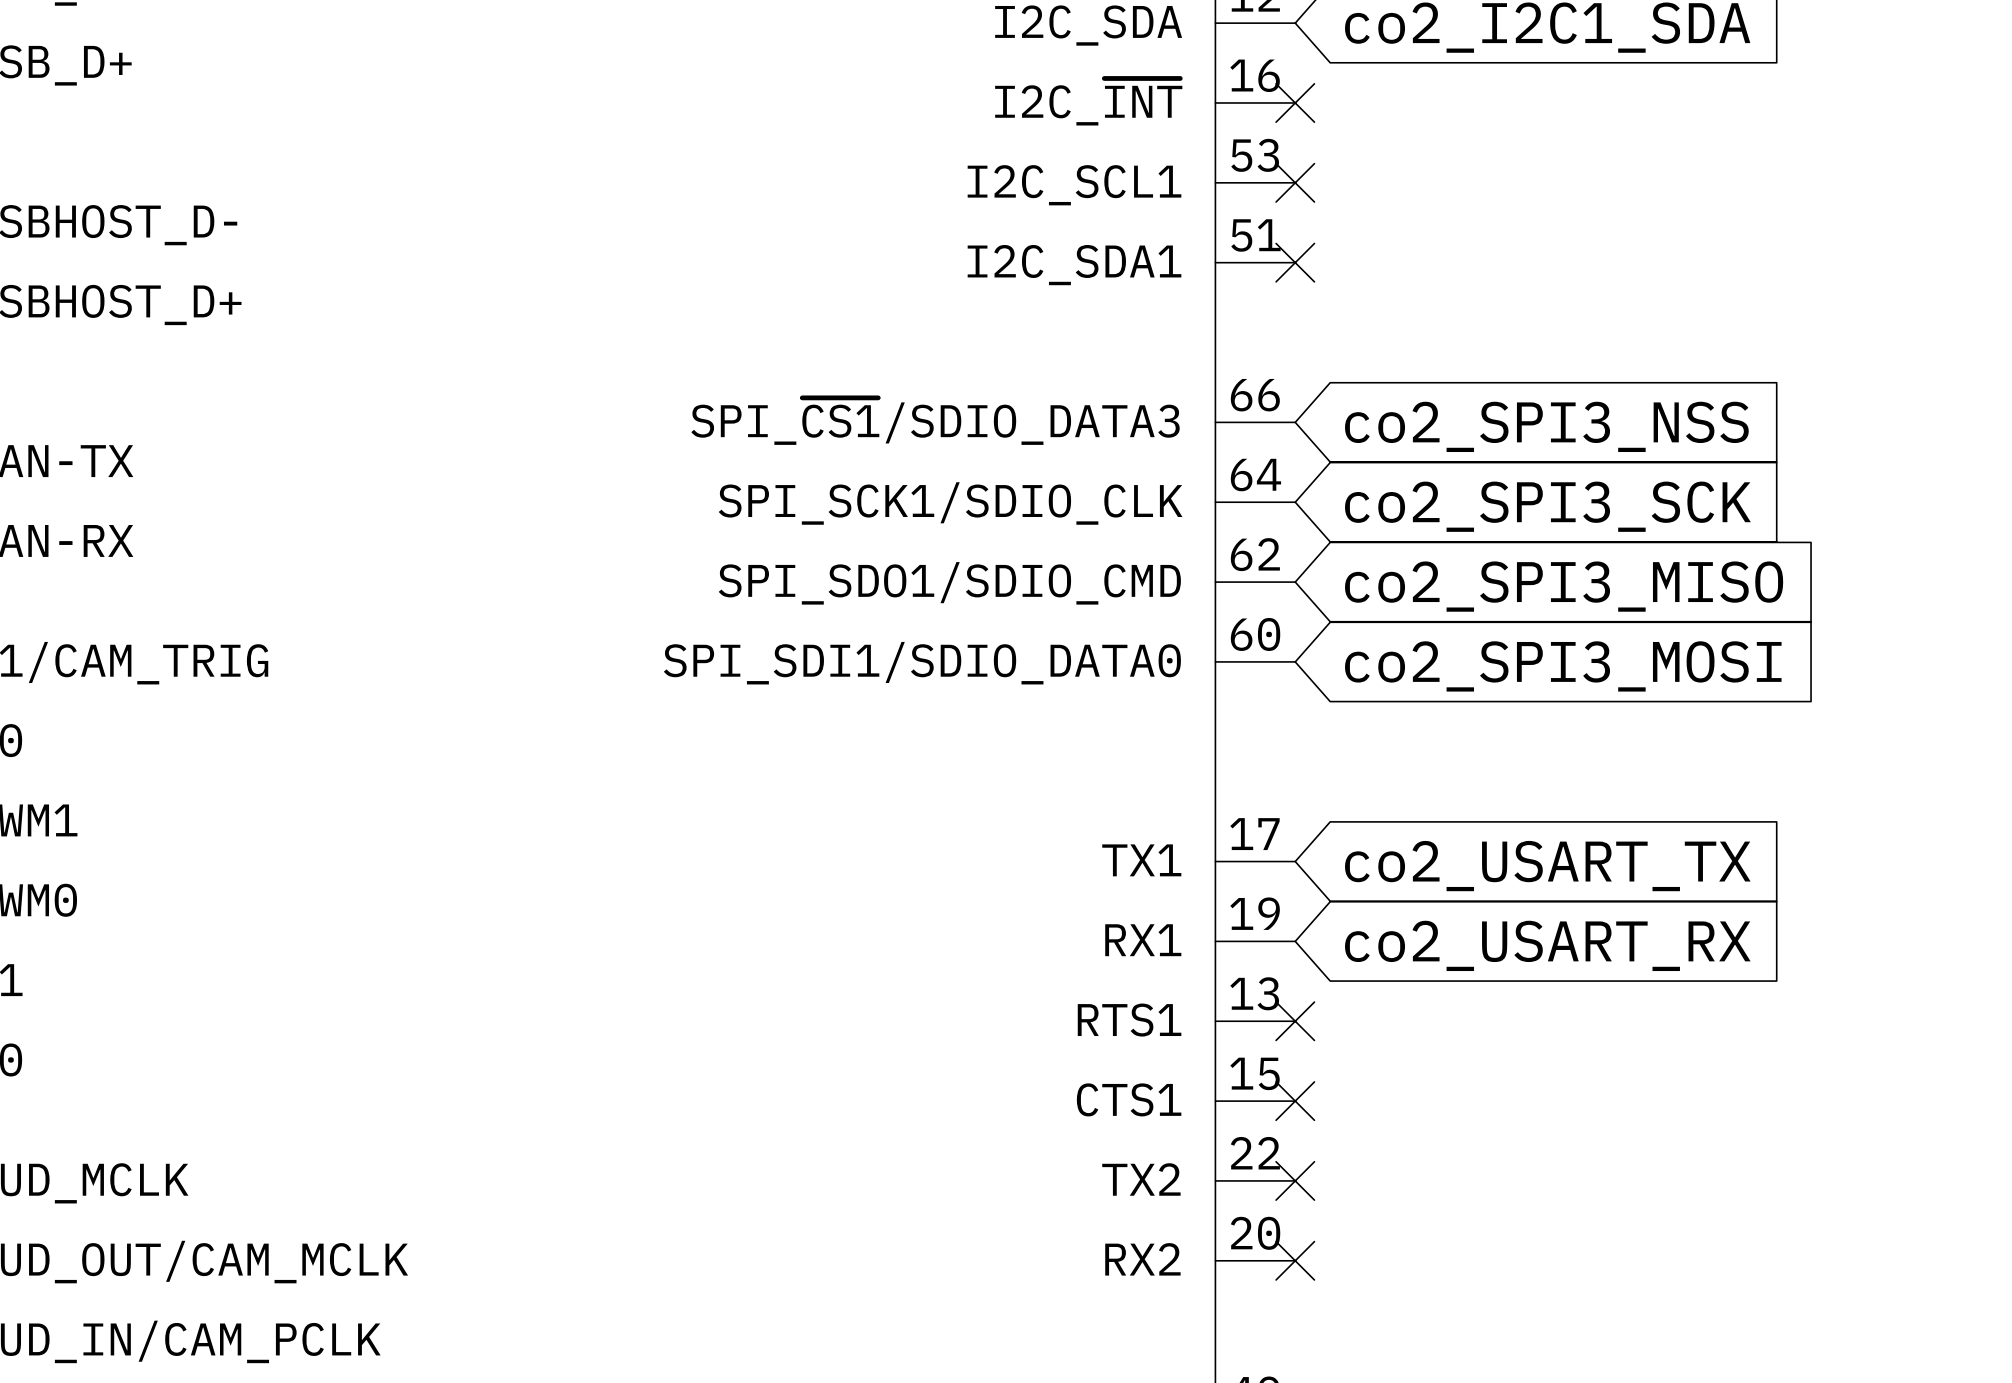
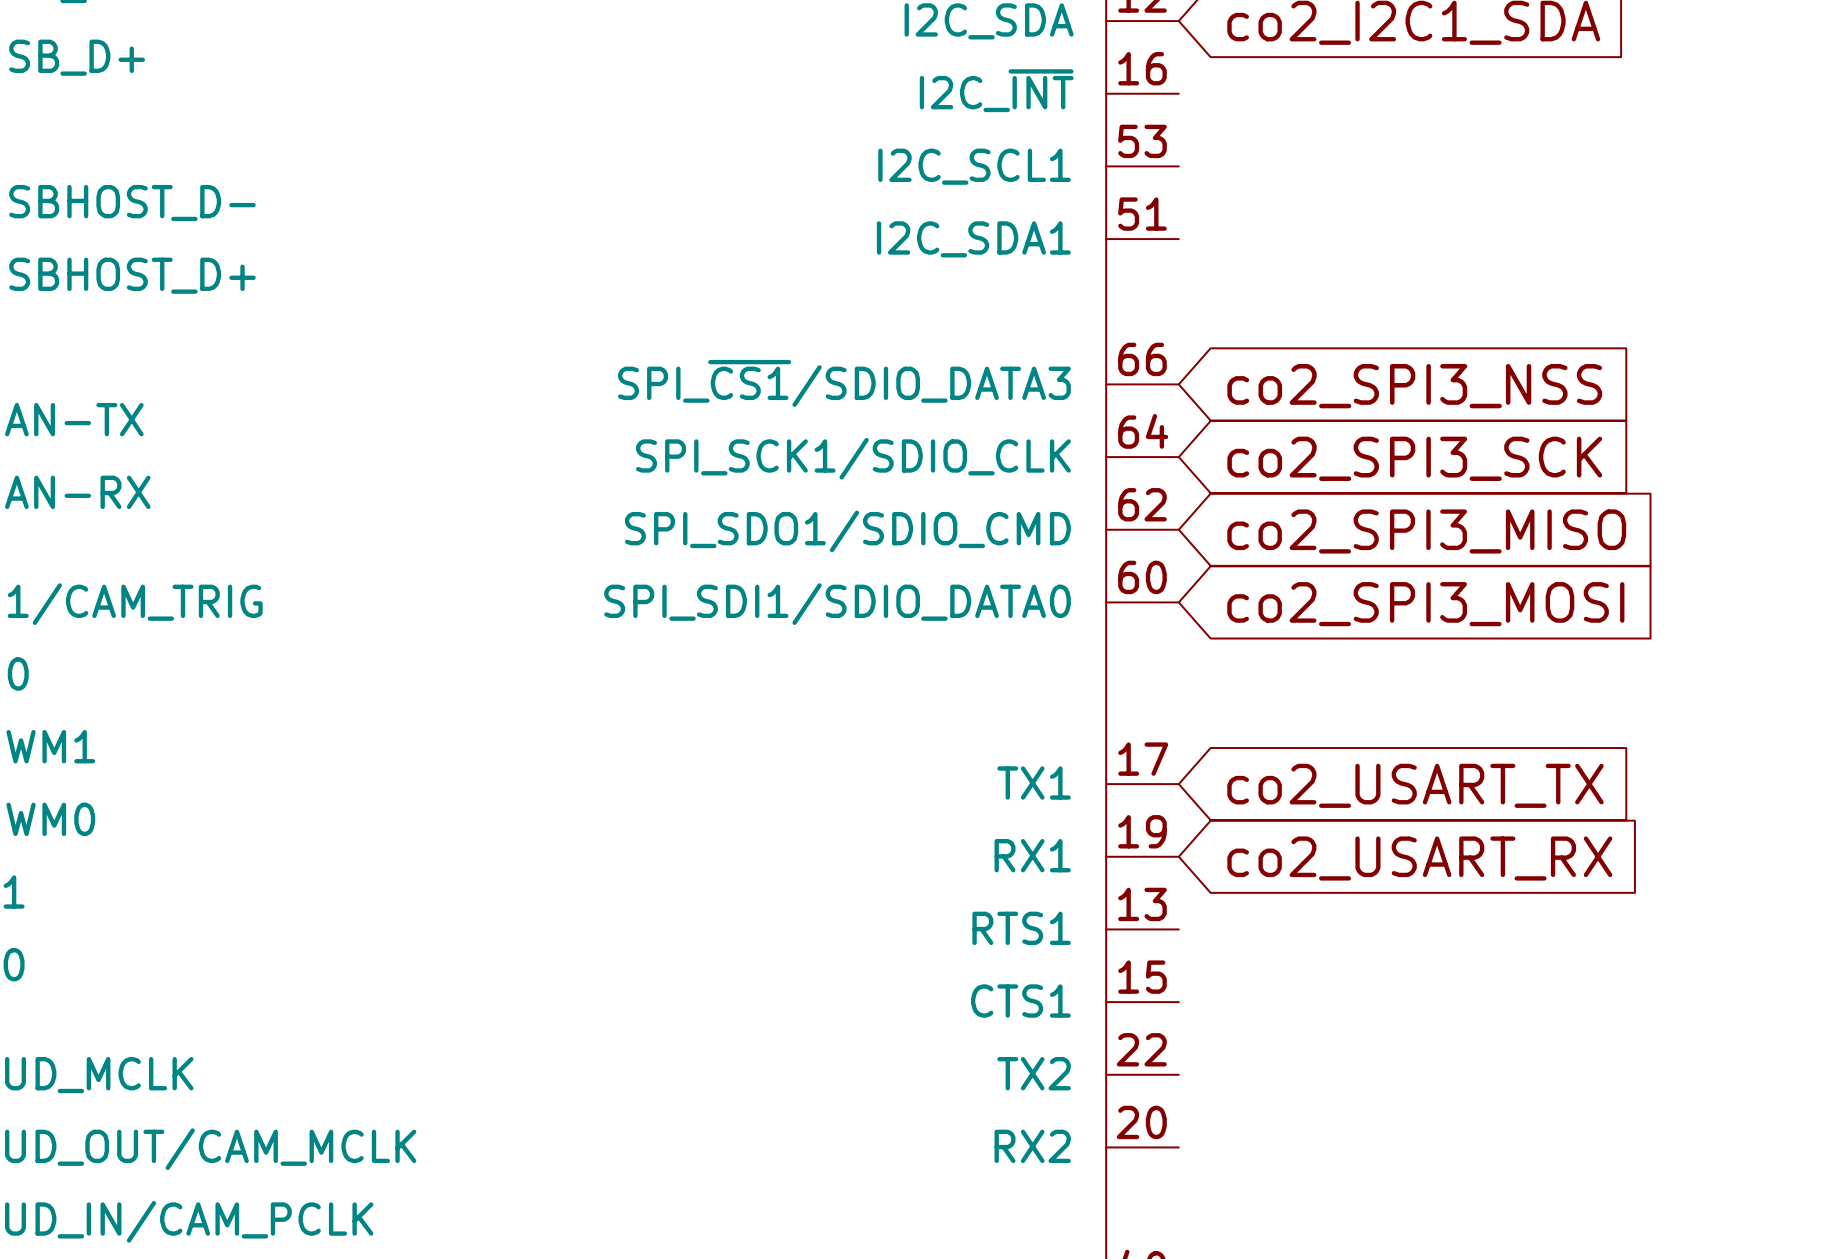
no-connect mark: (1295, 102) -> none
no-connect mark: (1295, 182) -> none
no-connect mark: (1295, 262) -> none
no-connect mark: (1295, 1021) -> none
no-connect mark: (1295, 1101) -> none
no-connect mark: (1295, 1180) -> none
no-connect mark: (1295, 1260) -> none

